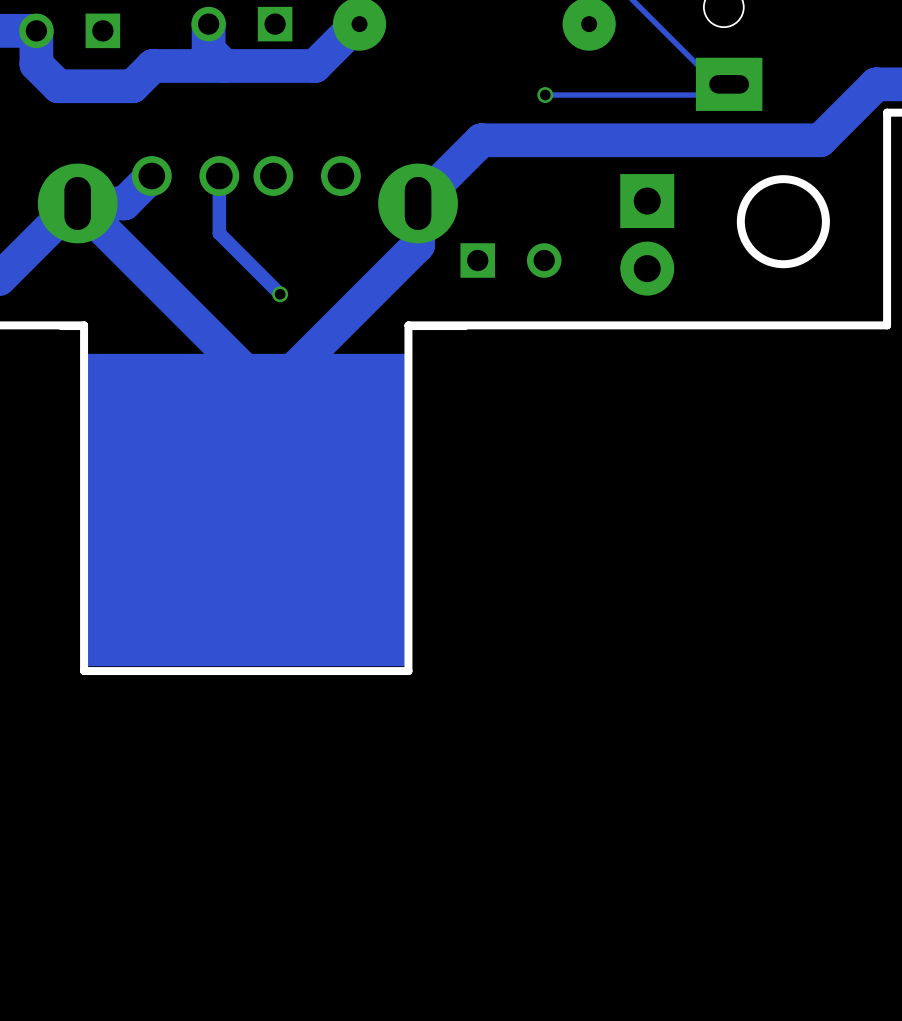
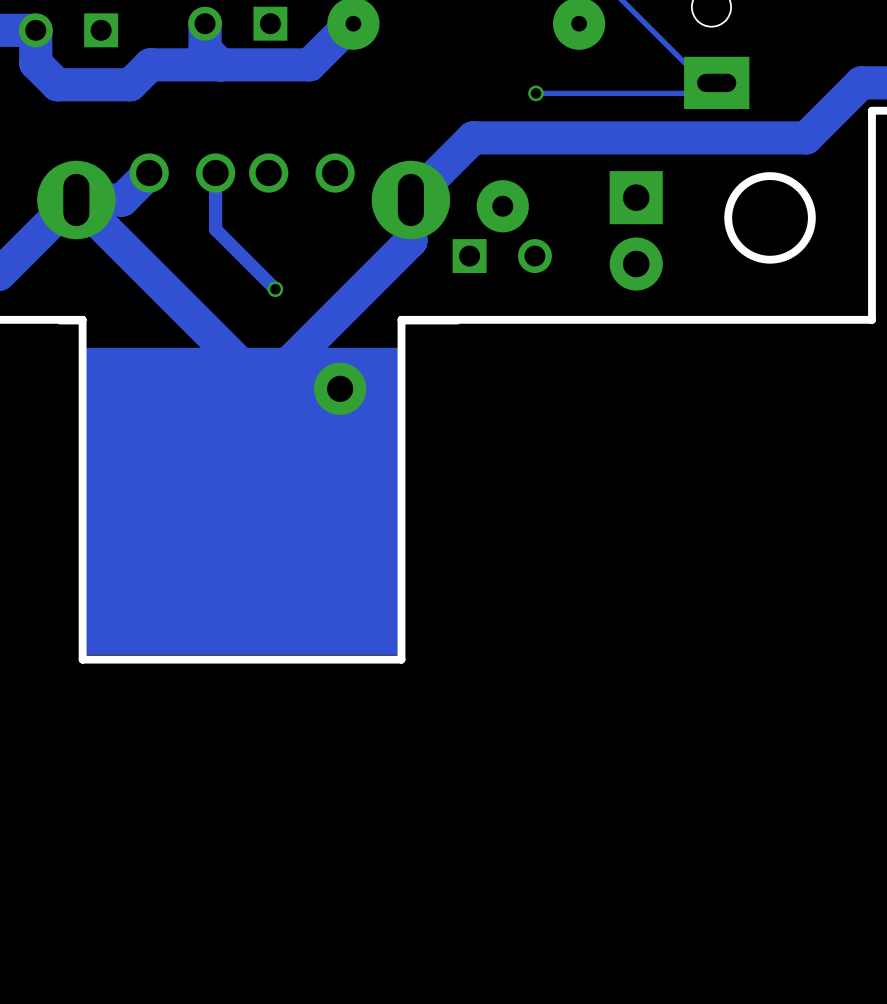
part: none -> (502, 206)
via: none -> (340, 388)

